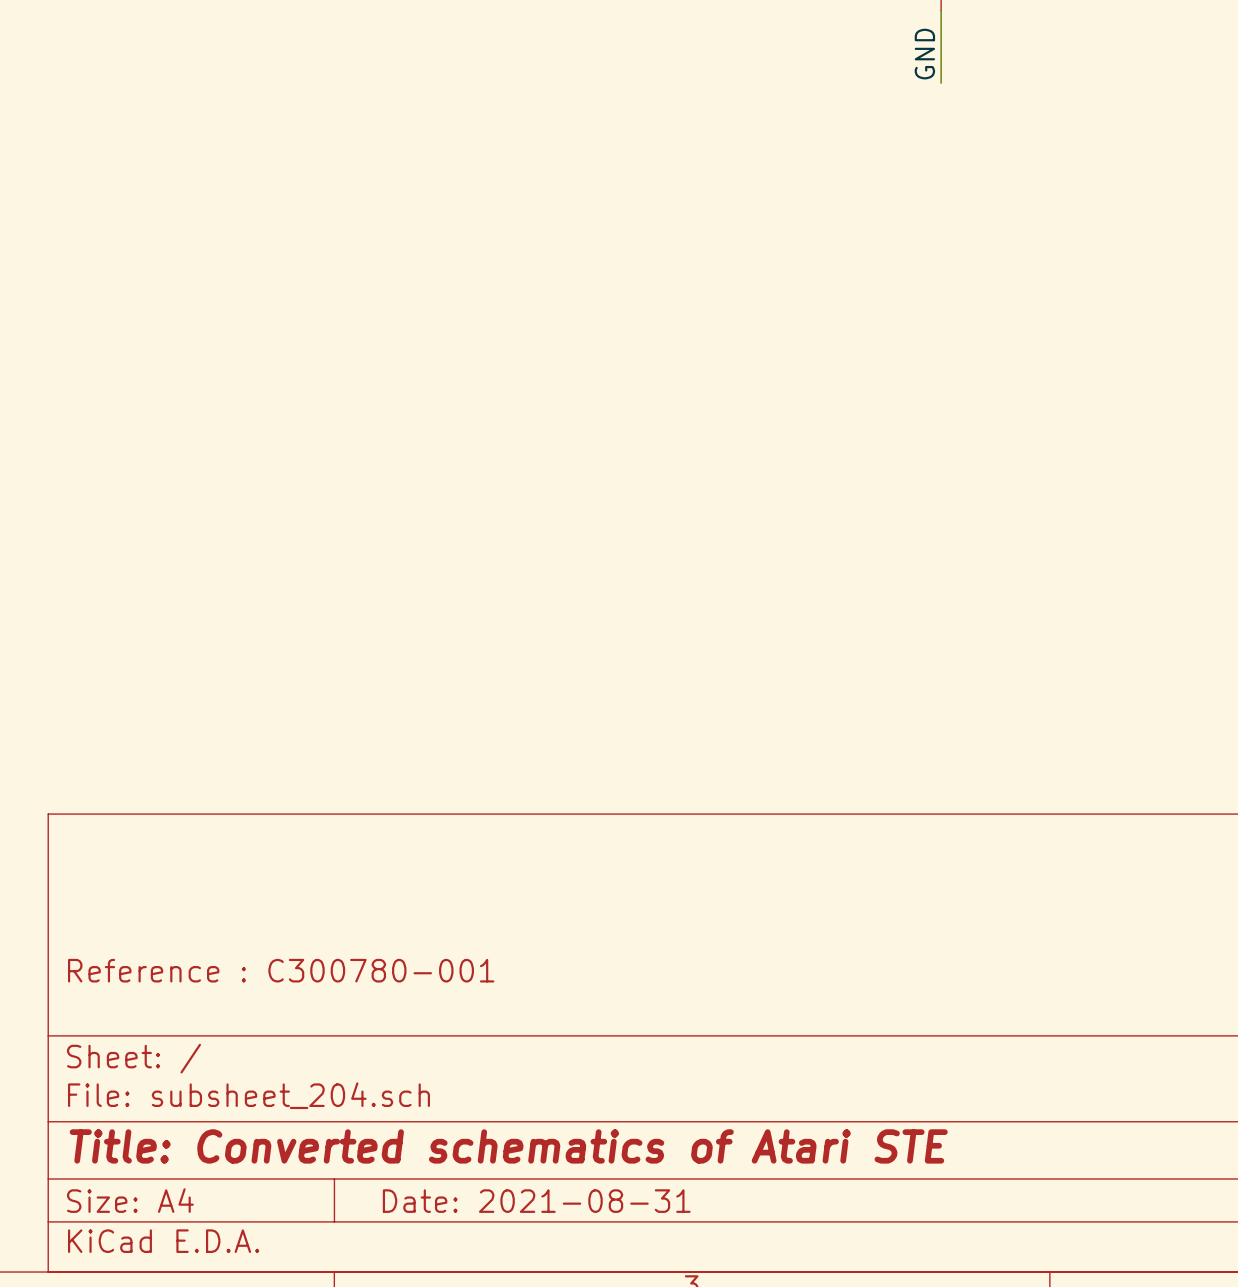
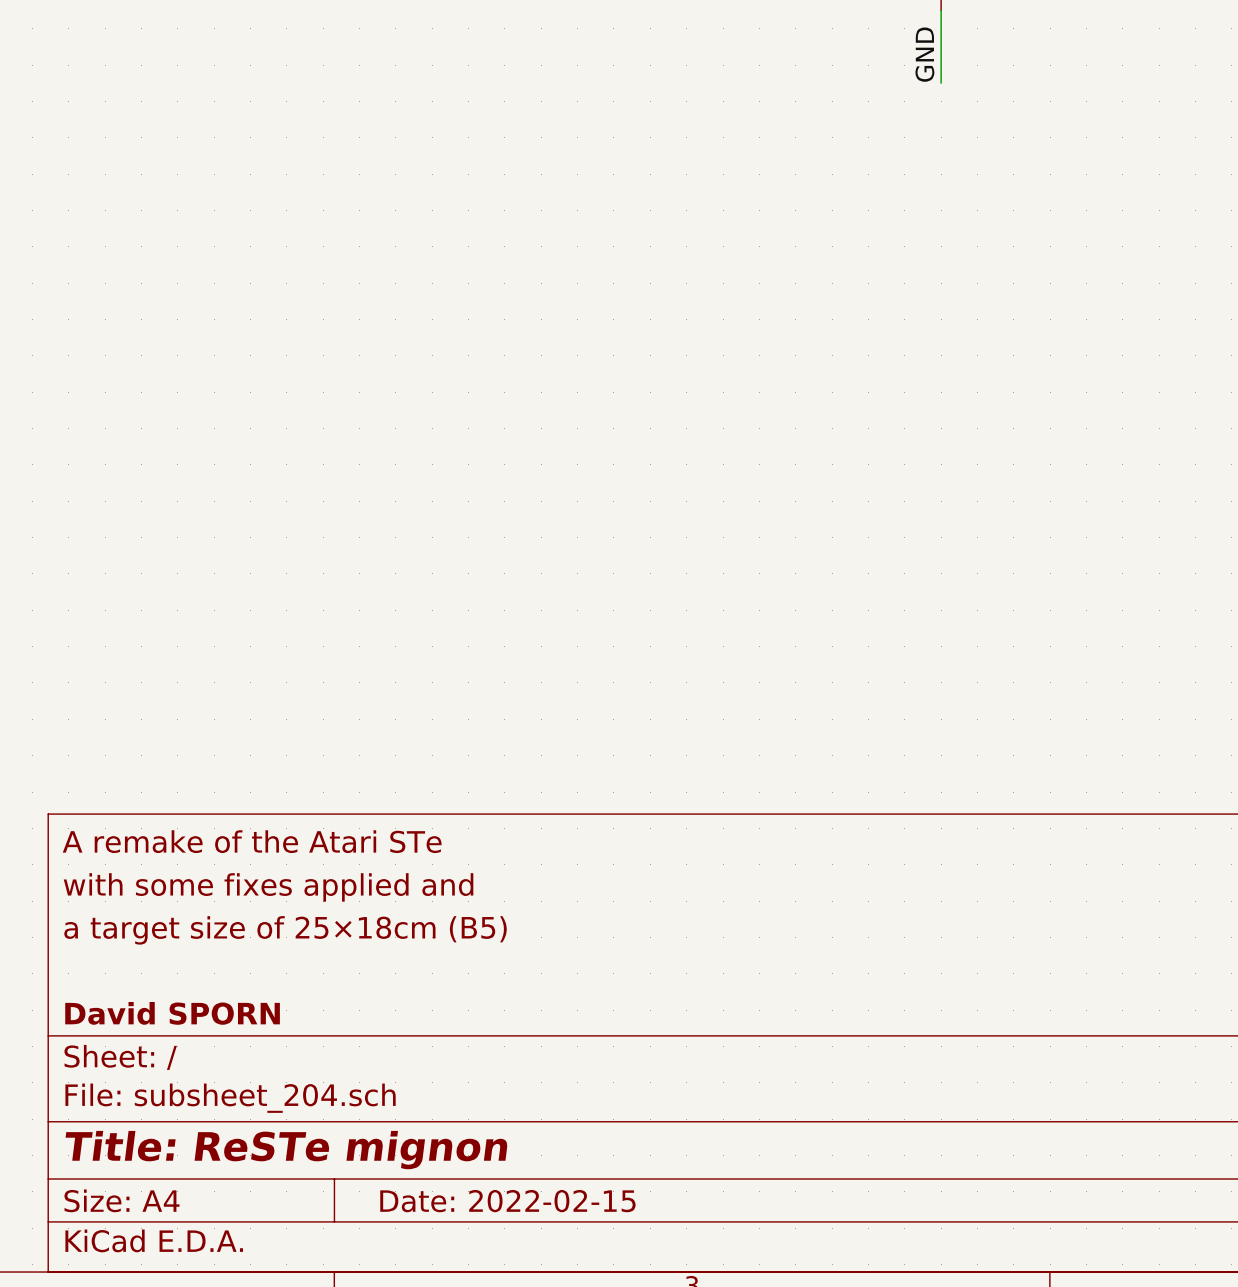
title block: none -> A remake of the Atari STe (252, 841)
title block: none -> with some fixes applied and (268, 887)
title block: none -> a target size of 25×18cm (B5) (285, 930)
title block: Reference : C300780-001 (281, 970) -> none
title block: none -> David SPORN (172, 1013)
title block: Title: Converted schematics of Atari STE (508, 1146) -> Title: ReSTe mignon (286, 1150)
title block: Date: 2021-08-31 (536, 1201) -> Date: 2022-02-15 (507, 1201)

